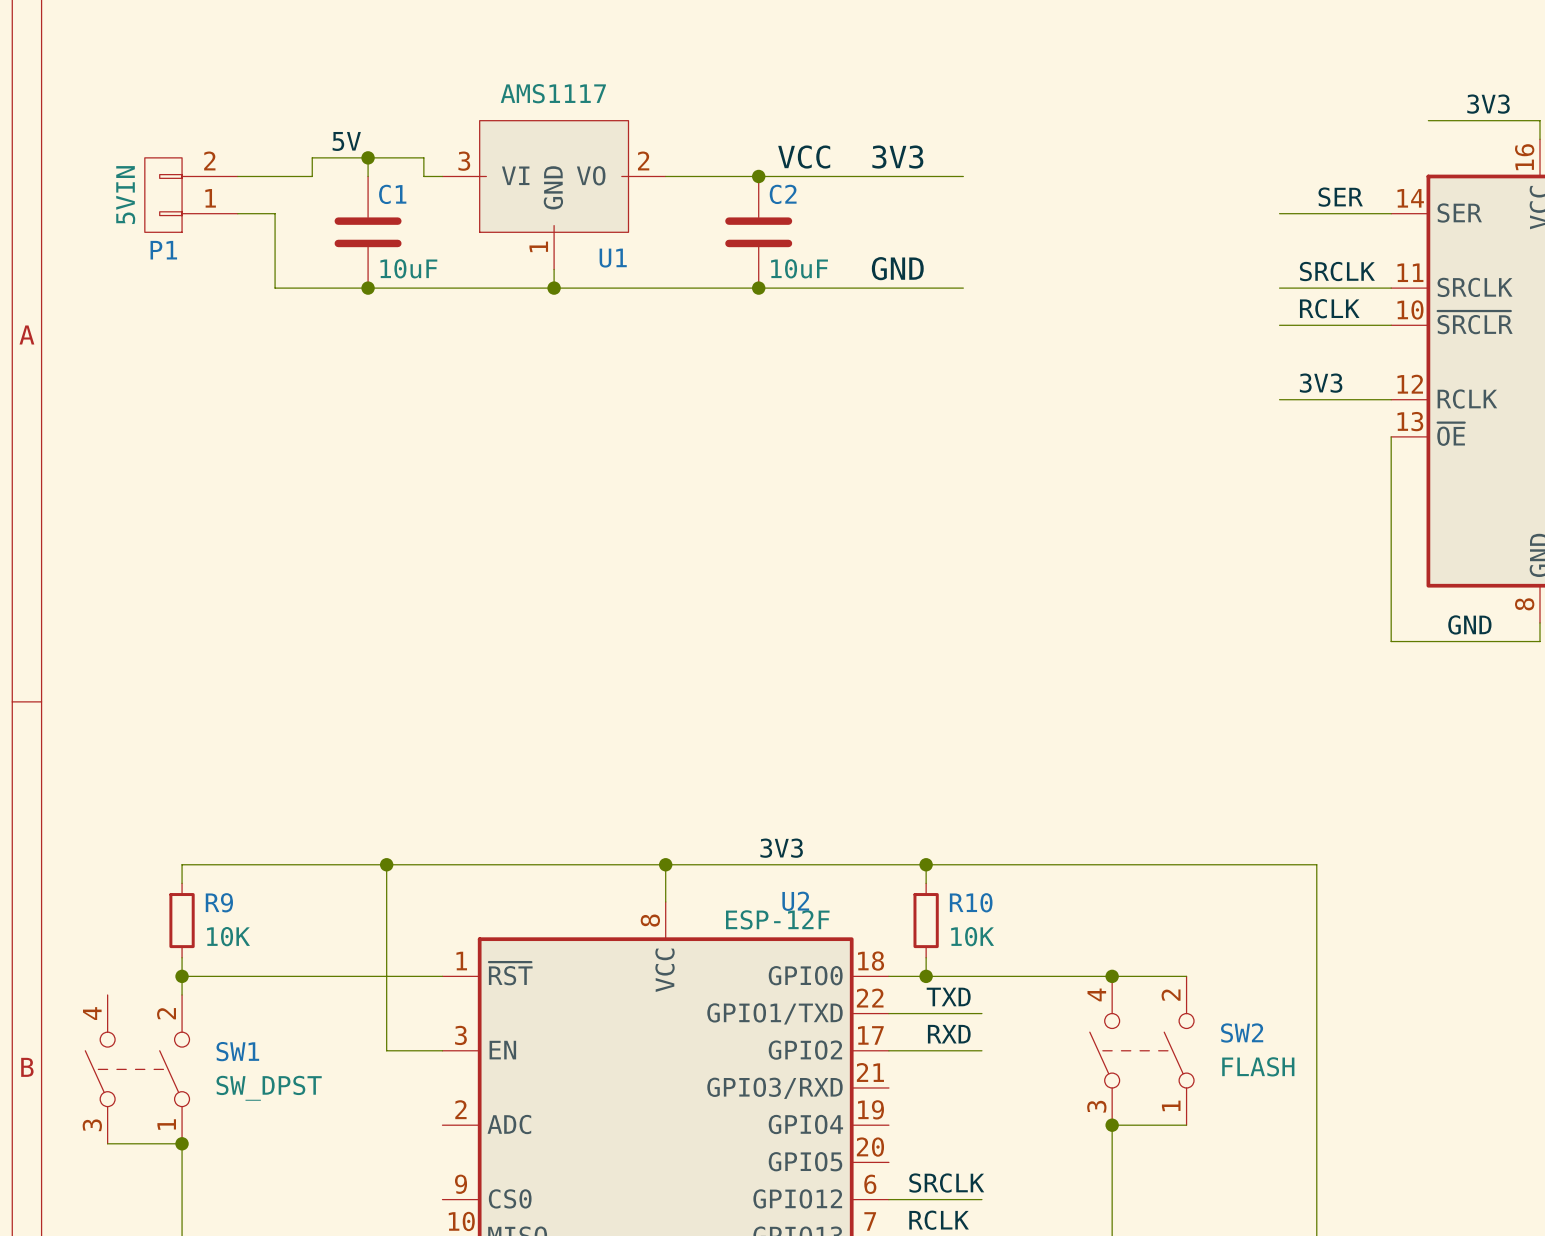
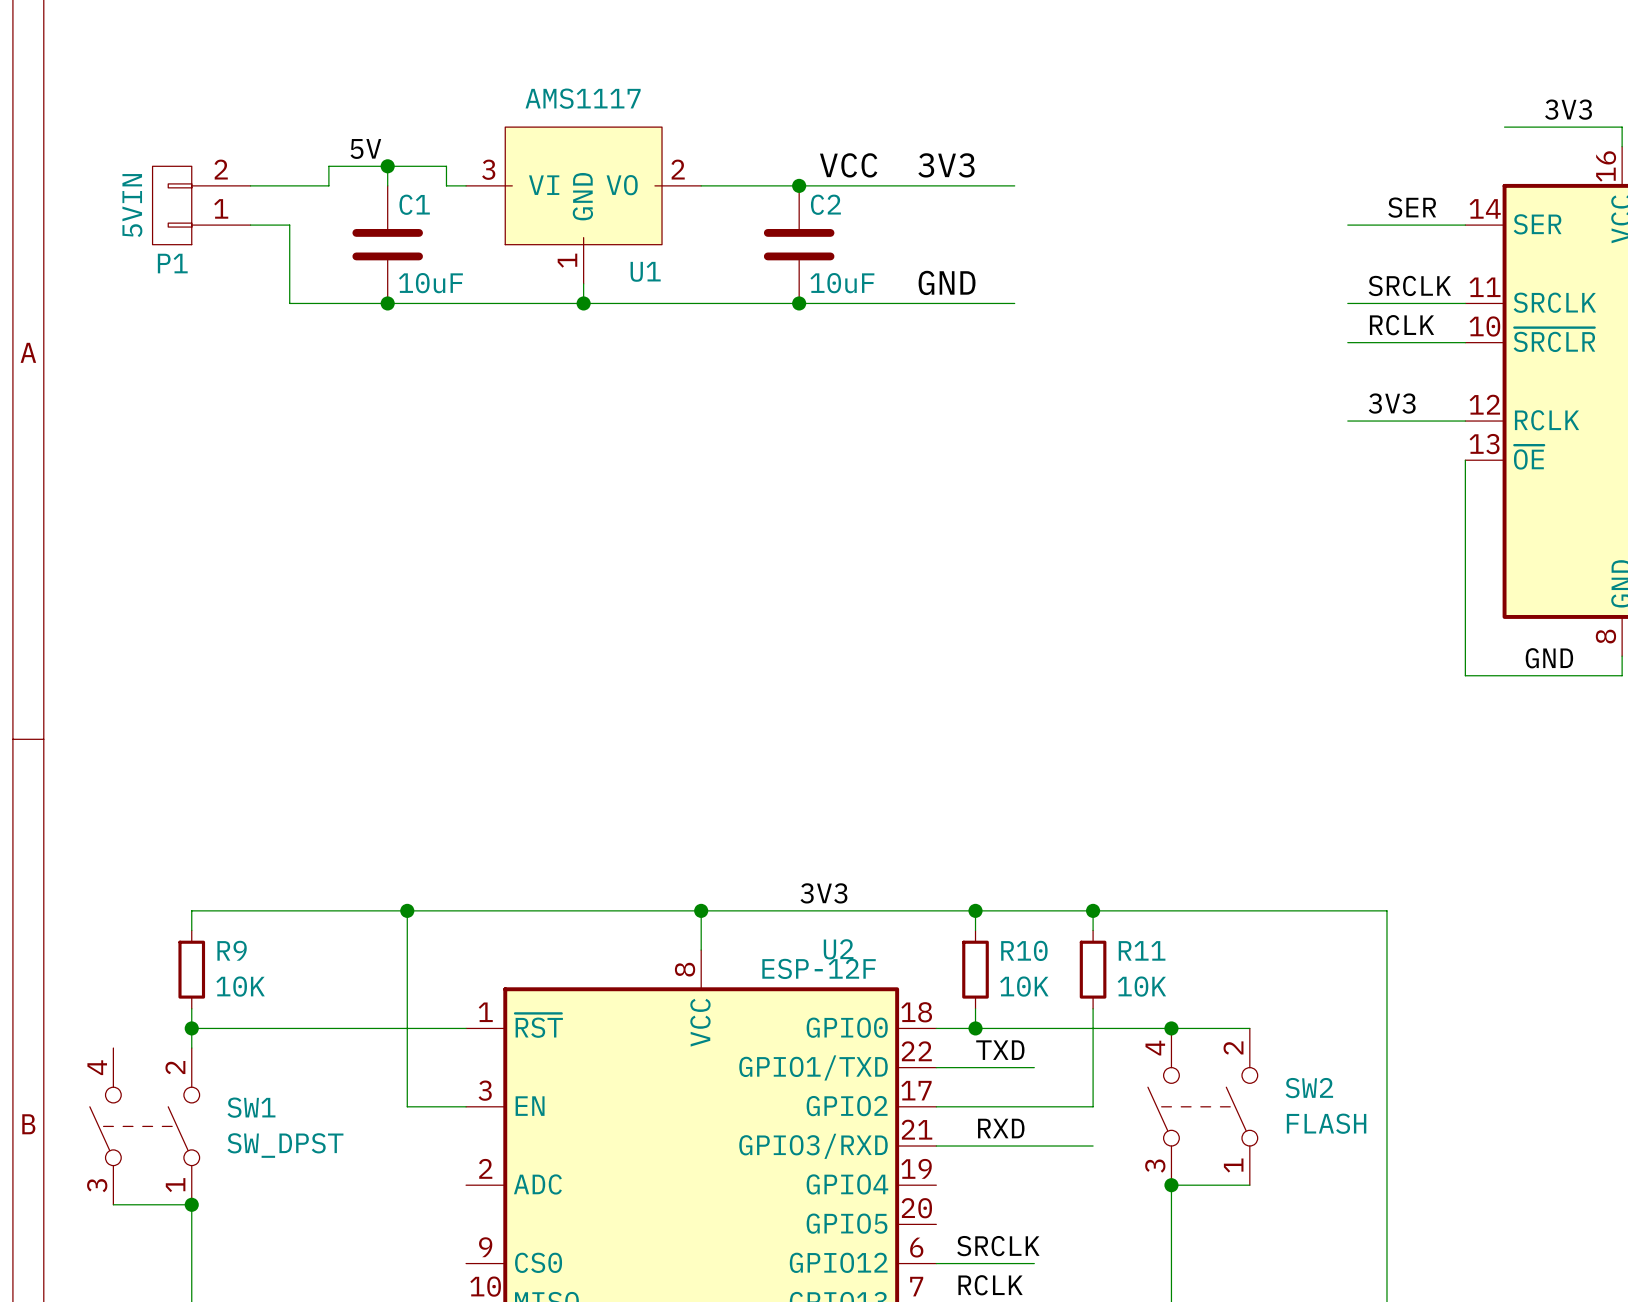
wire: none -> (1093, 910) (1093, 930)
junction: none -> (1093, 910)
R11: none -> 10K (1093, 969)
wire: none -> (1093, 1008) (1093, 1106) (1034, 1106)
label position: RXD (949, 1034) -> RXD (1001, 1128)
wire: none -> (936, 1146) (1093, 1146)

